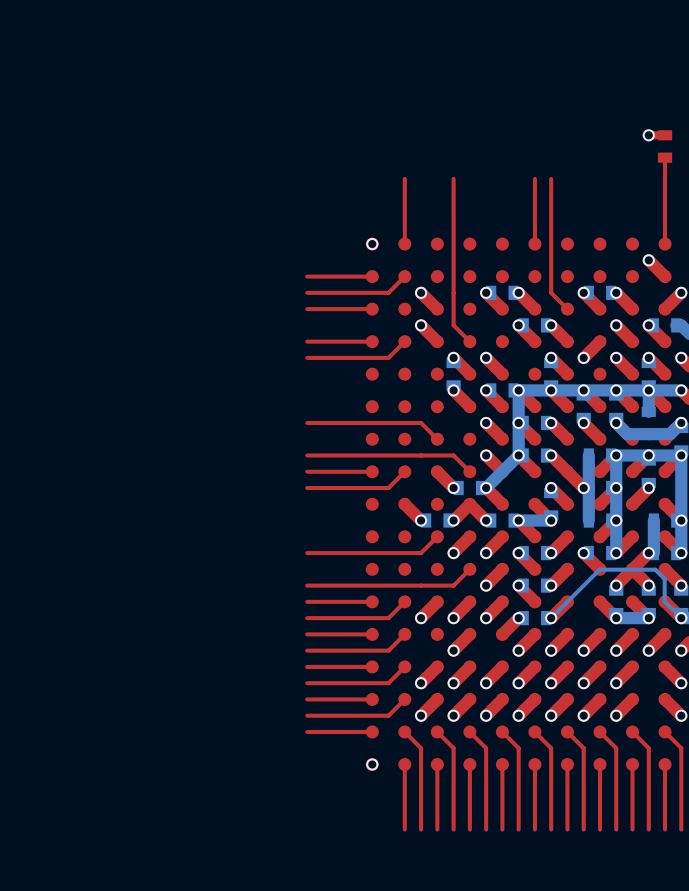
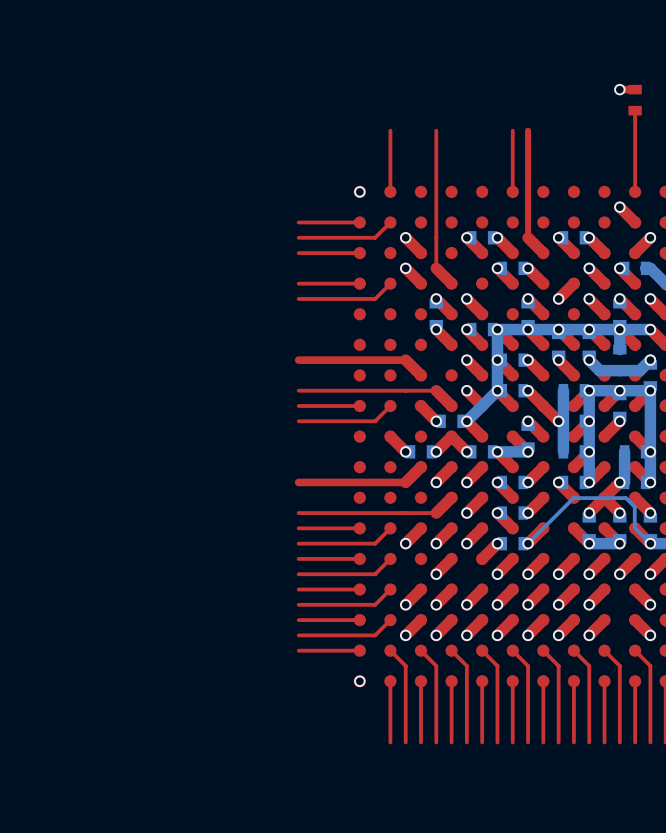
top track width: thin (551, 179) (551, 292) (567, 309) -> thick (528, 130) (528, 237) (543, 253)
top track width: thin (453, 325) (469, 341) -> thick (436, 268) (451, 283)
top track width: thin (307, 422) (421, 422) (437, 439) -> thick (298, 360) (405, 360) (421, 375)
top track width: thin (453, 455) (469, 471) -> thick (436, 390) (451, 406)
top track width: thin (437, 536) (421, 553) (307, 553) -> thick (421, 467) (405, 482) (298, 482)
top track width: thin (469, 569) (453, 585) -> thick (451, 497) (436, 513)

